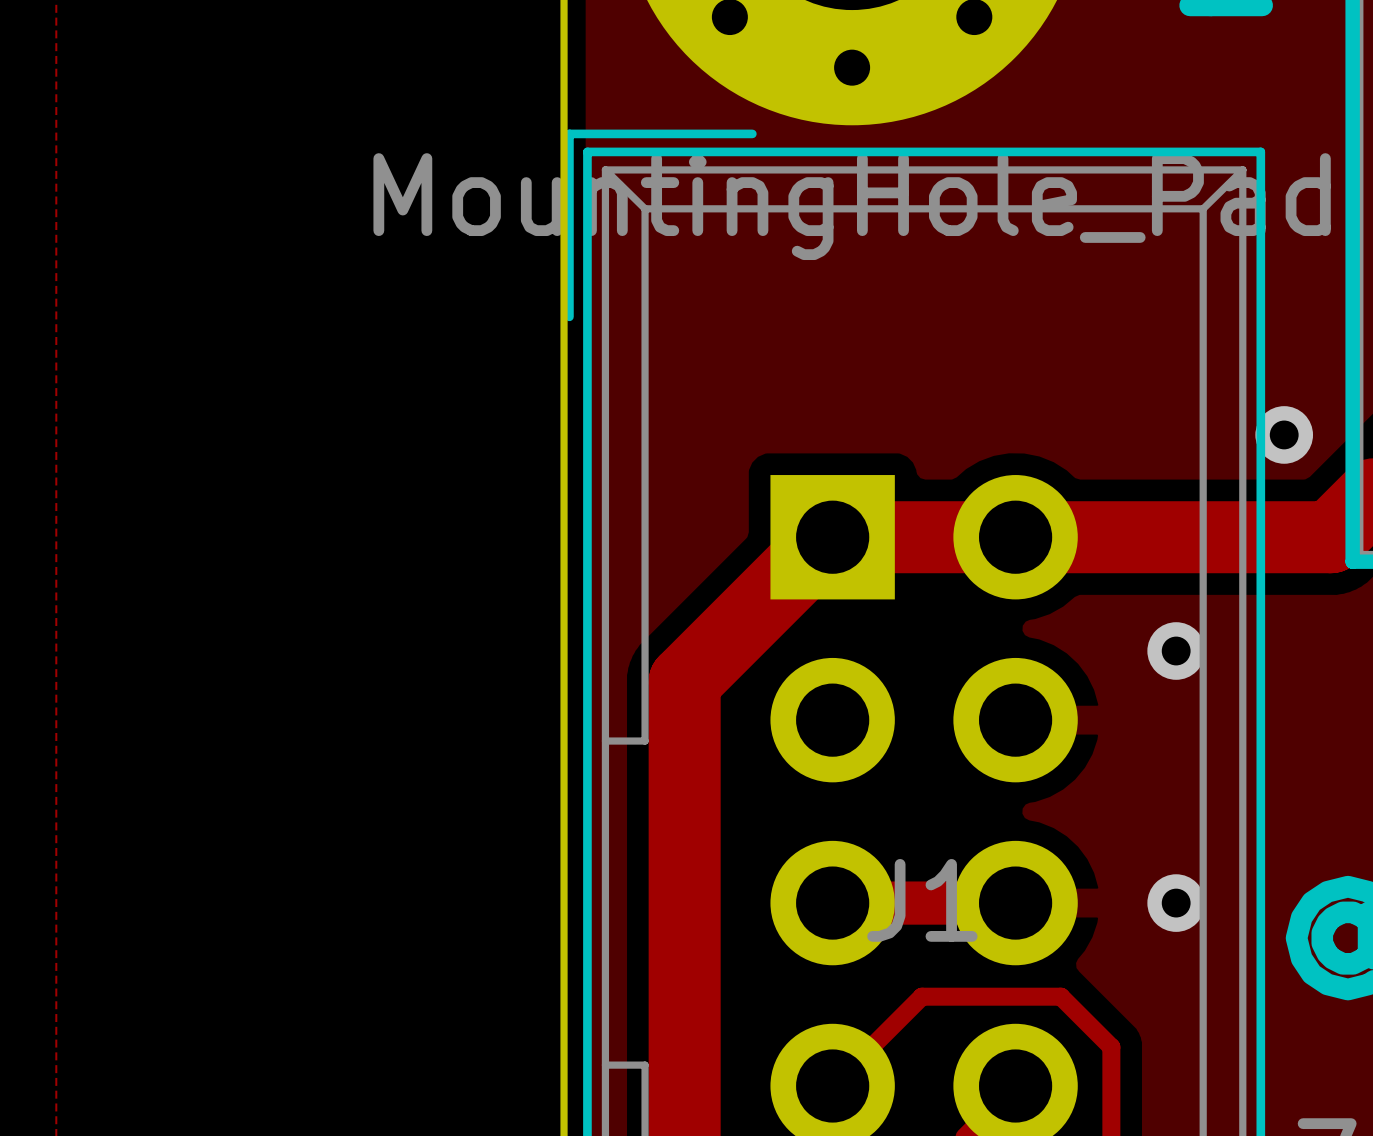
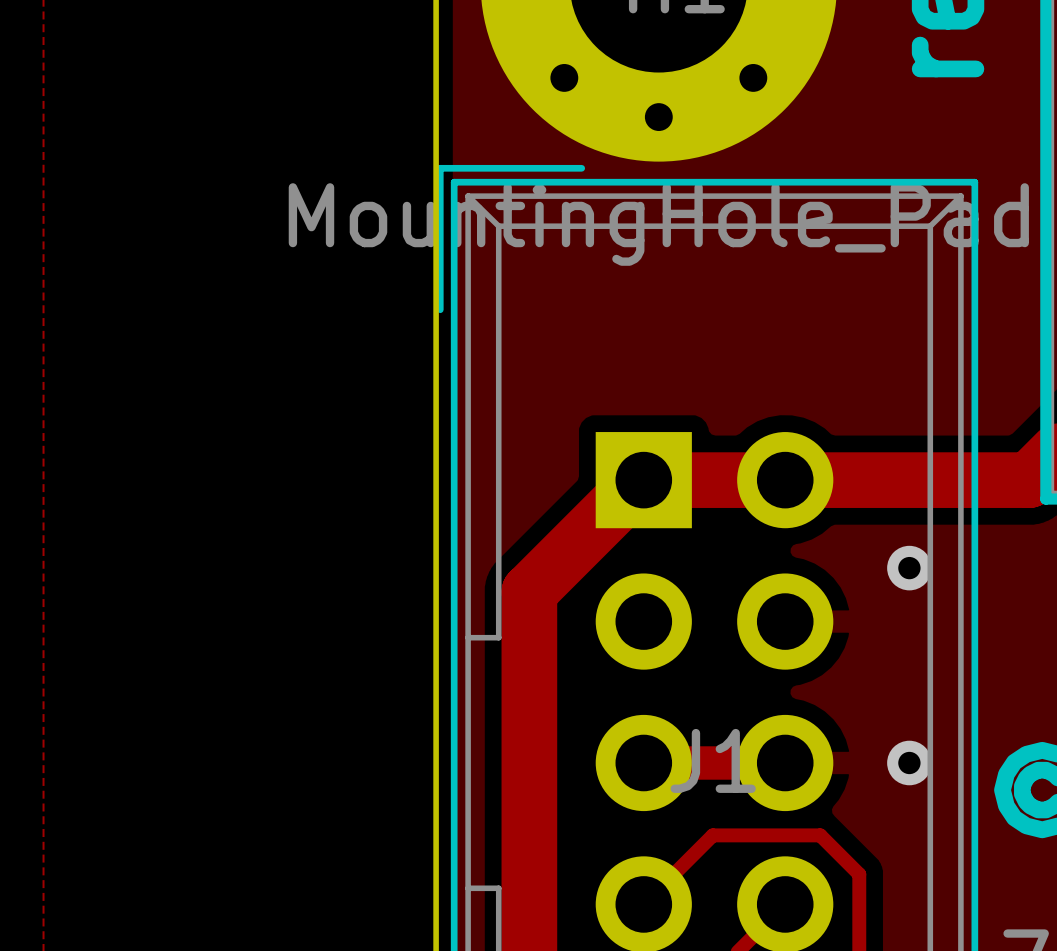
via: (1284, 434) -> none

